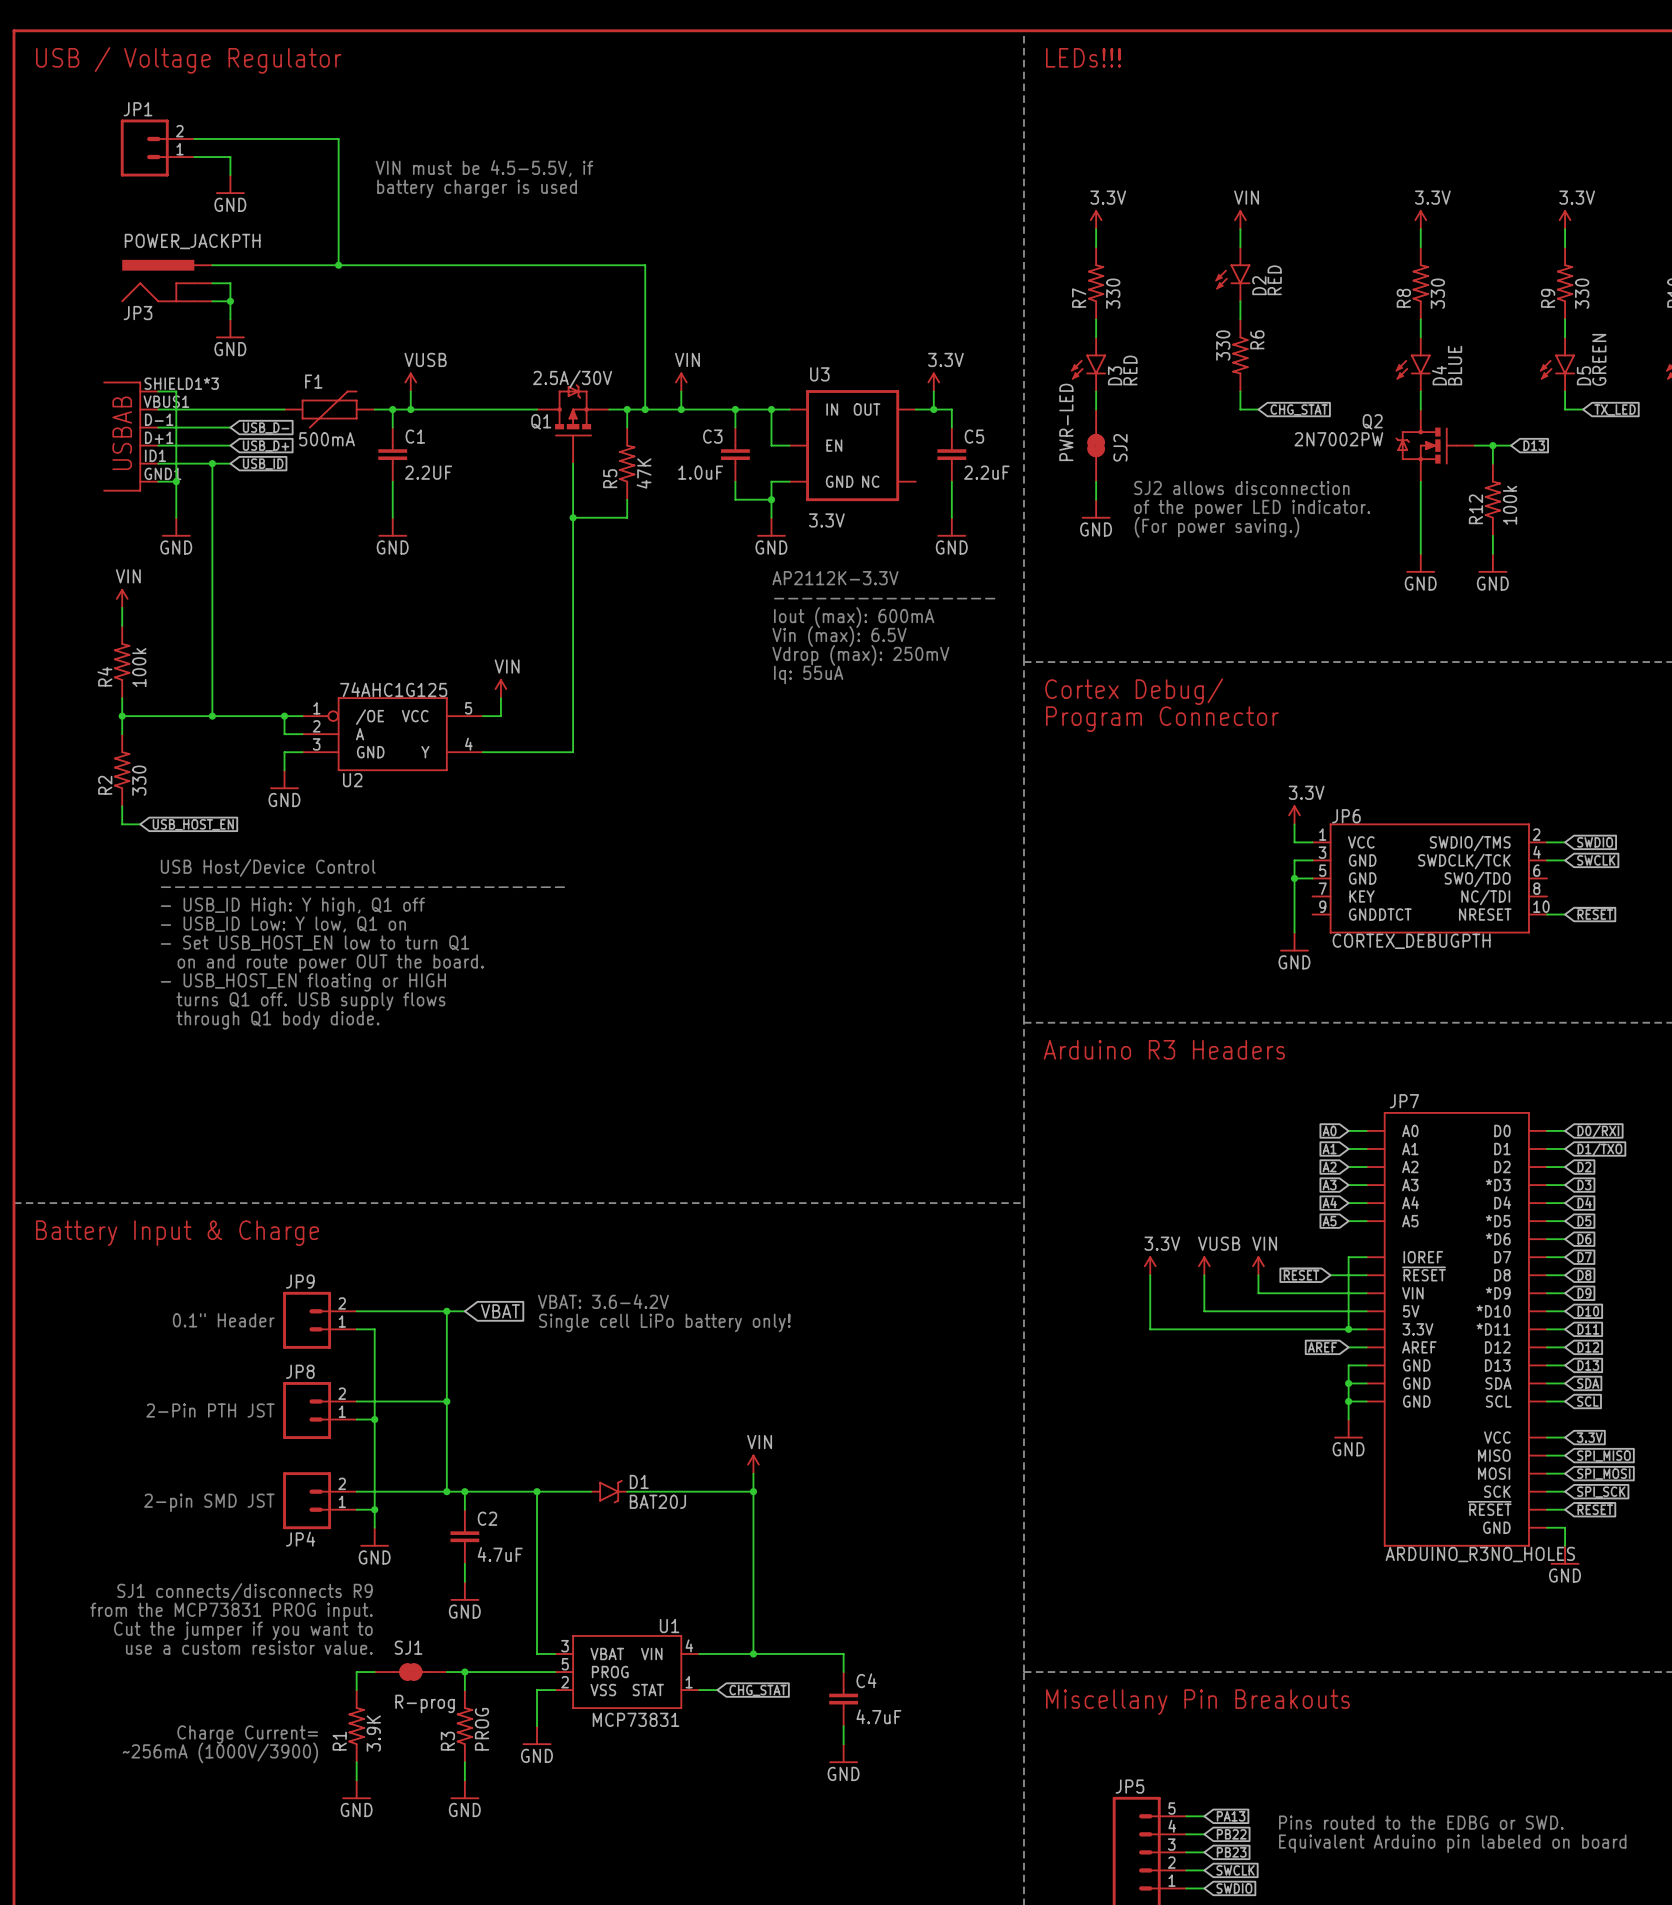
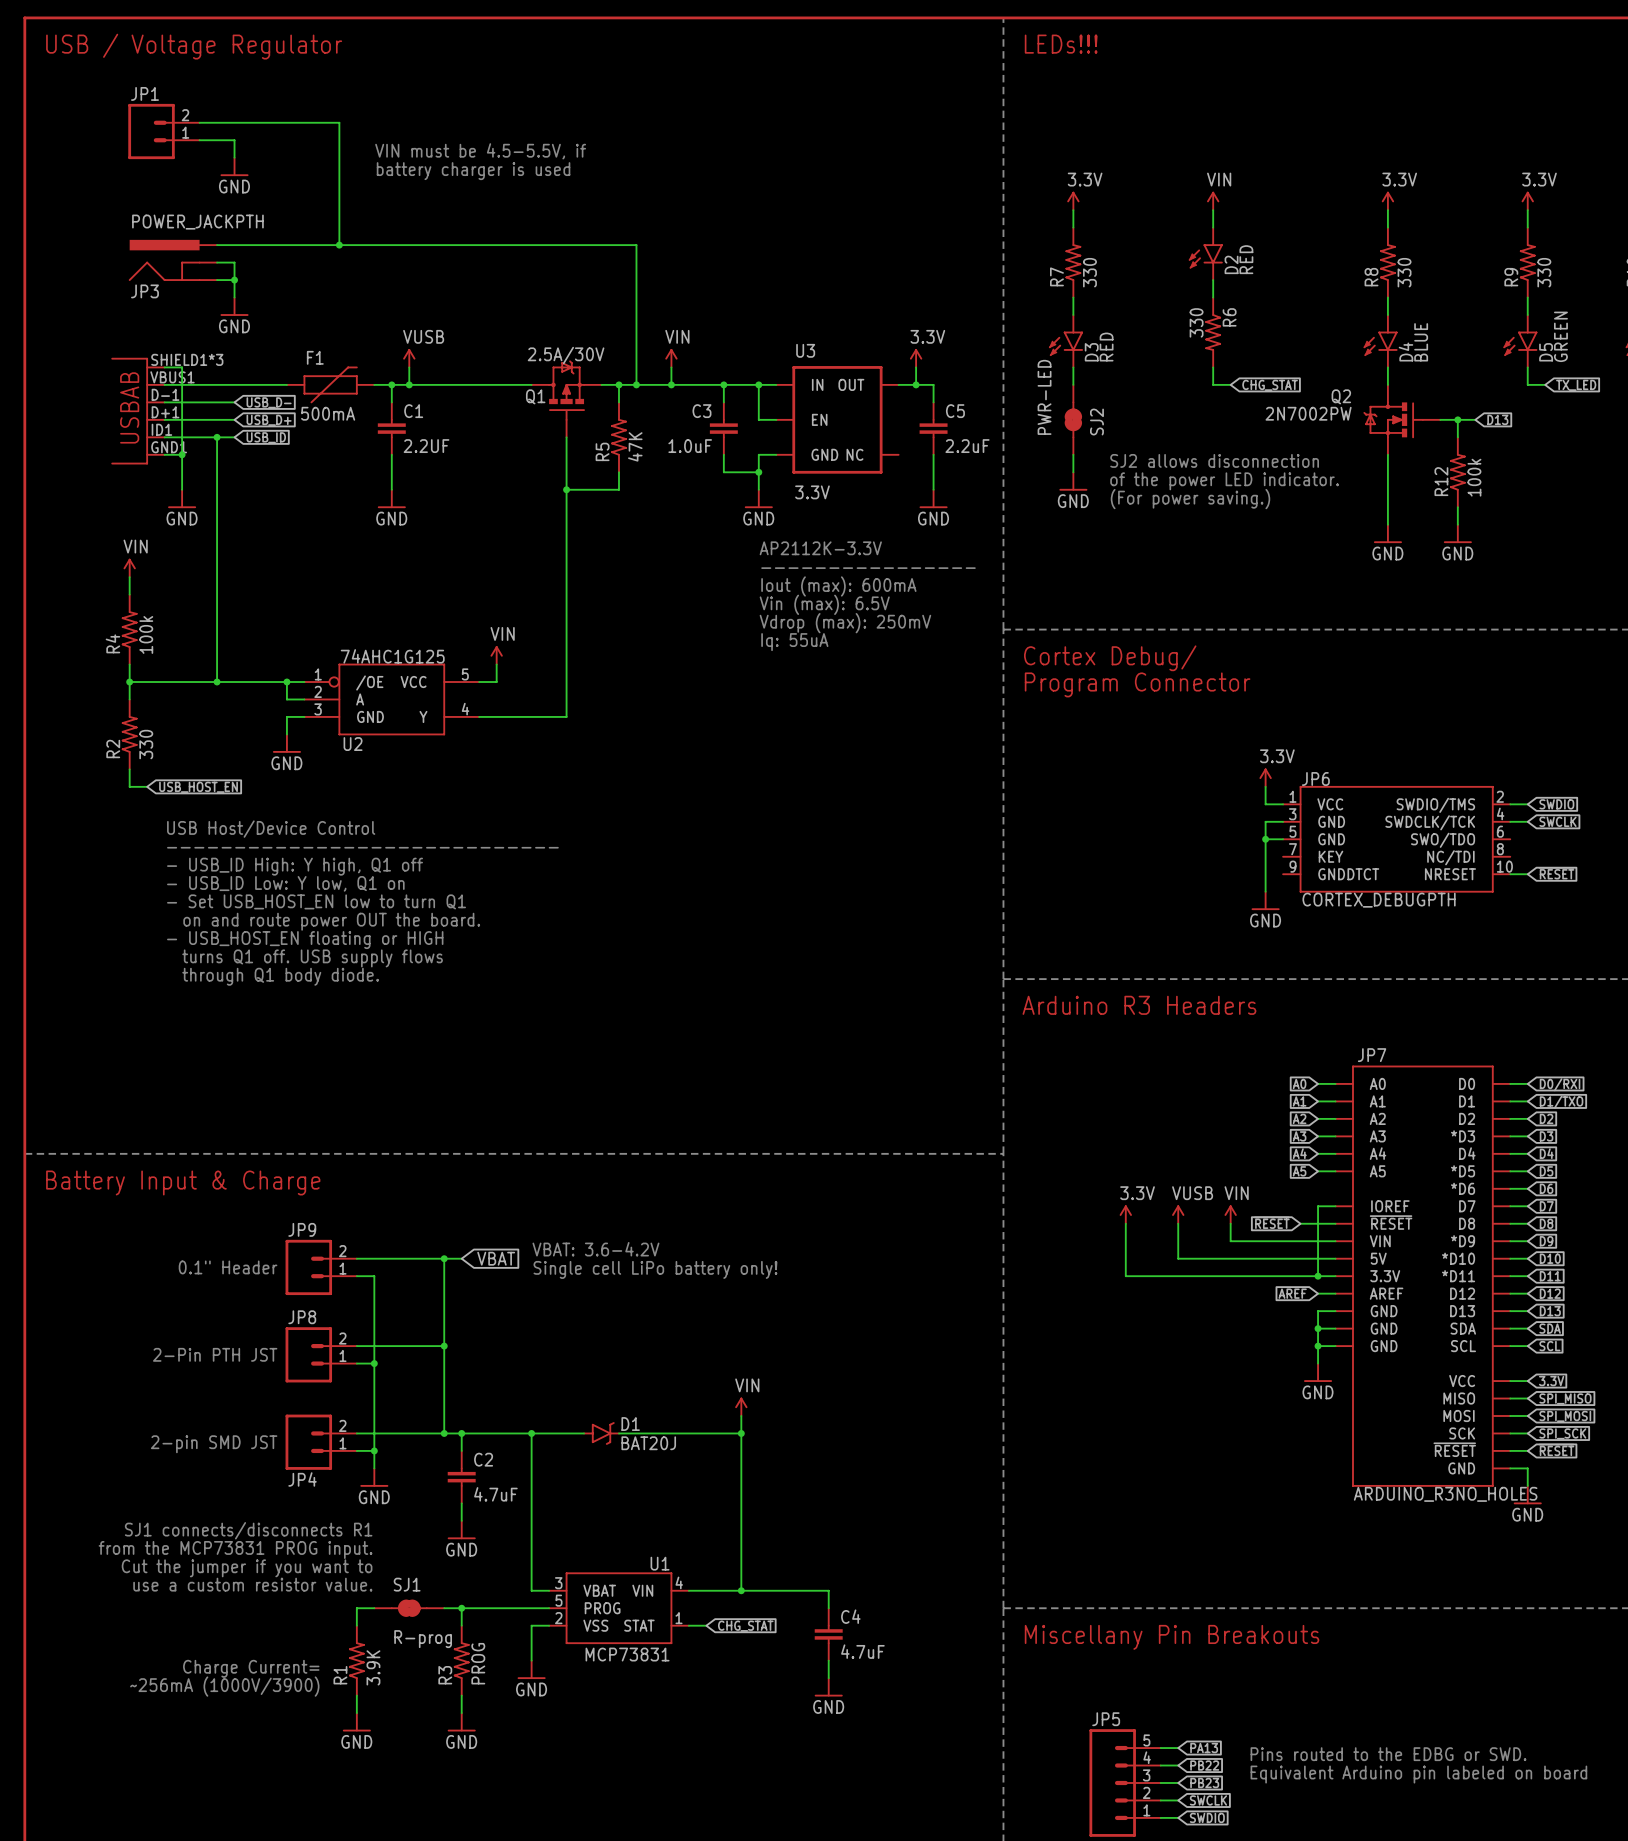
text: SJ1 connects/disconnects R9 (244, 1592) -> SJ1 connects/disconnects R1 (248, 1530)

